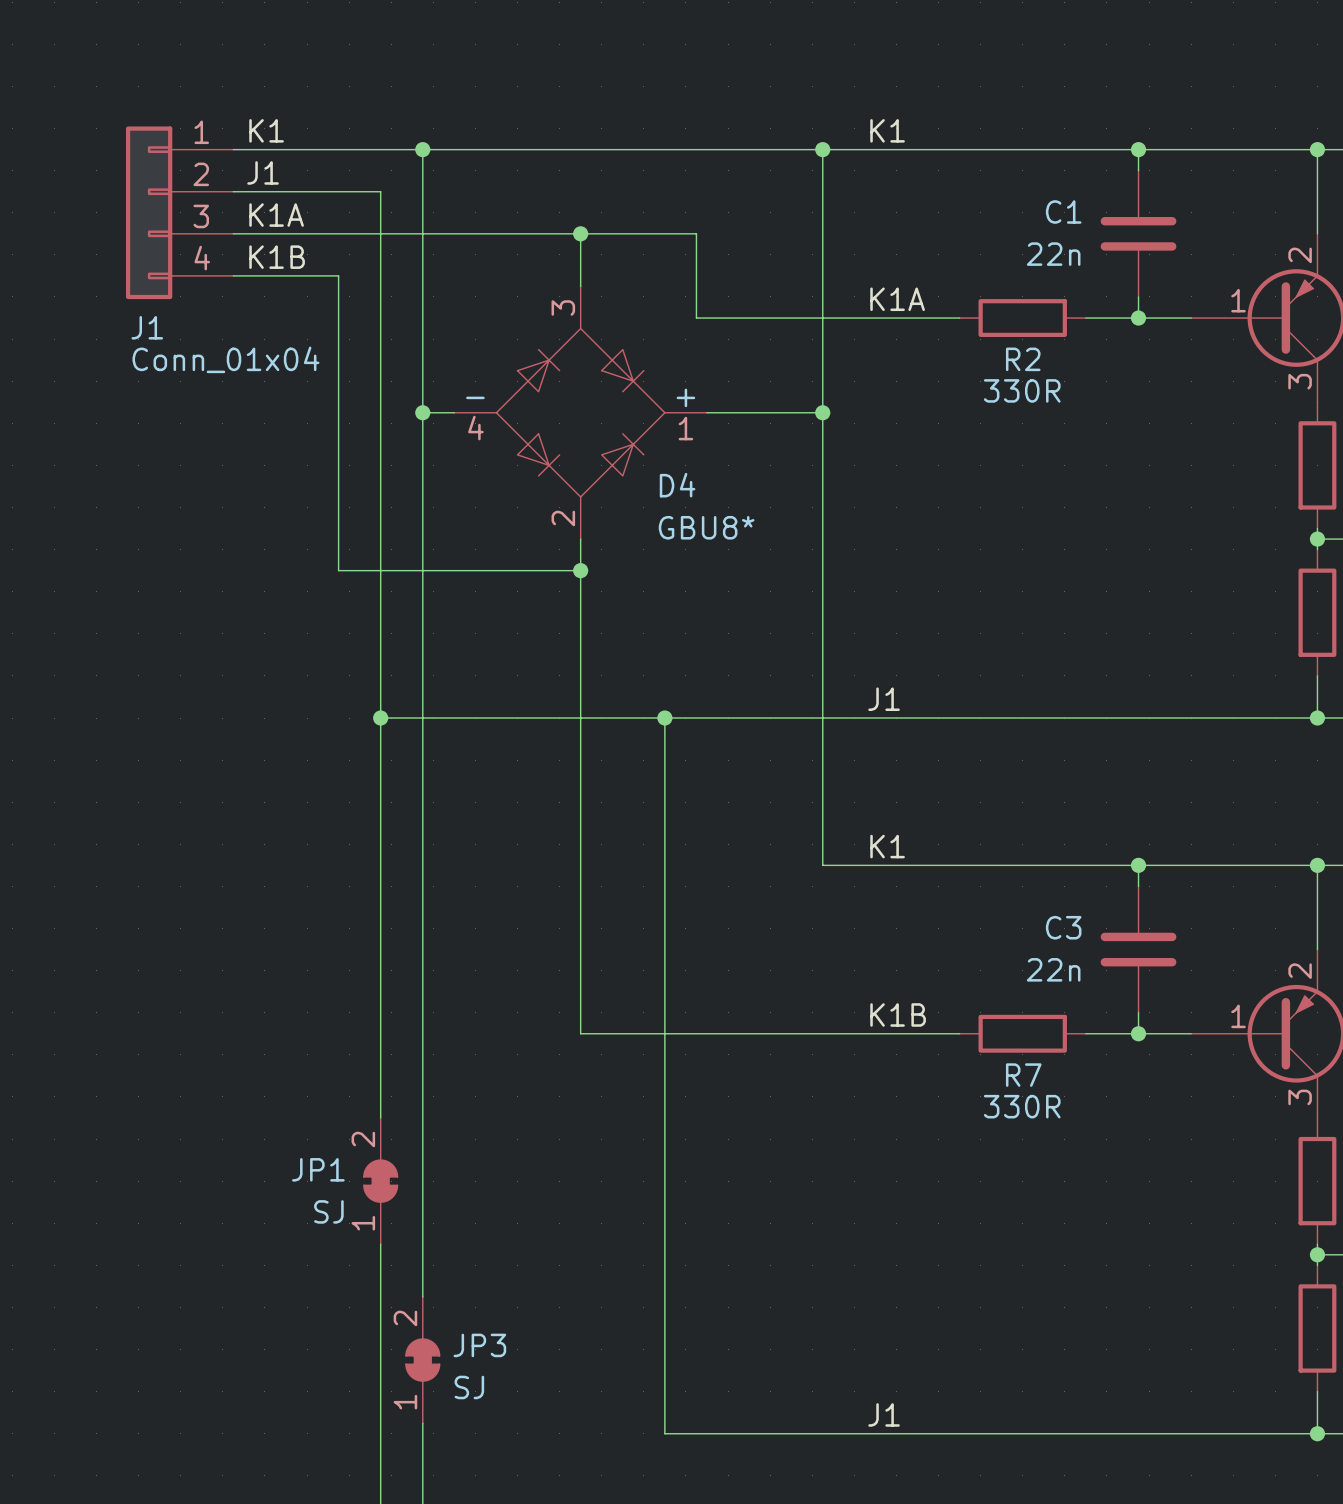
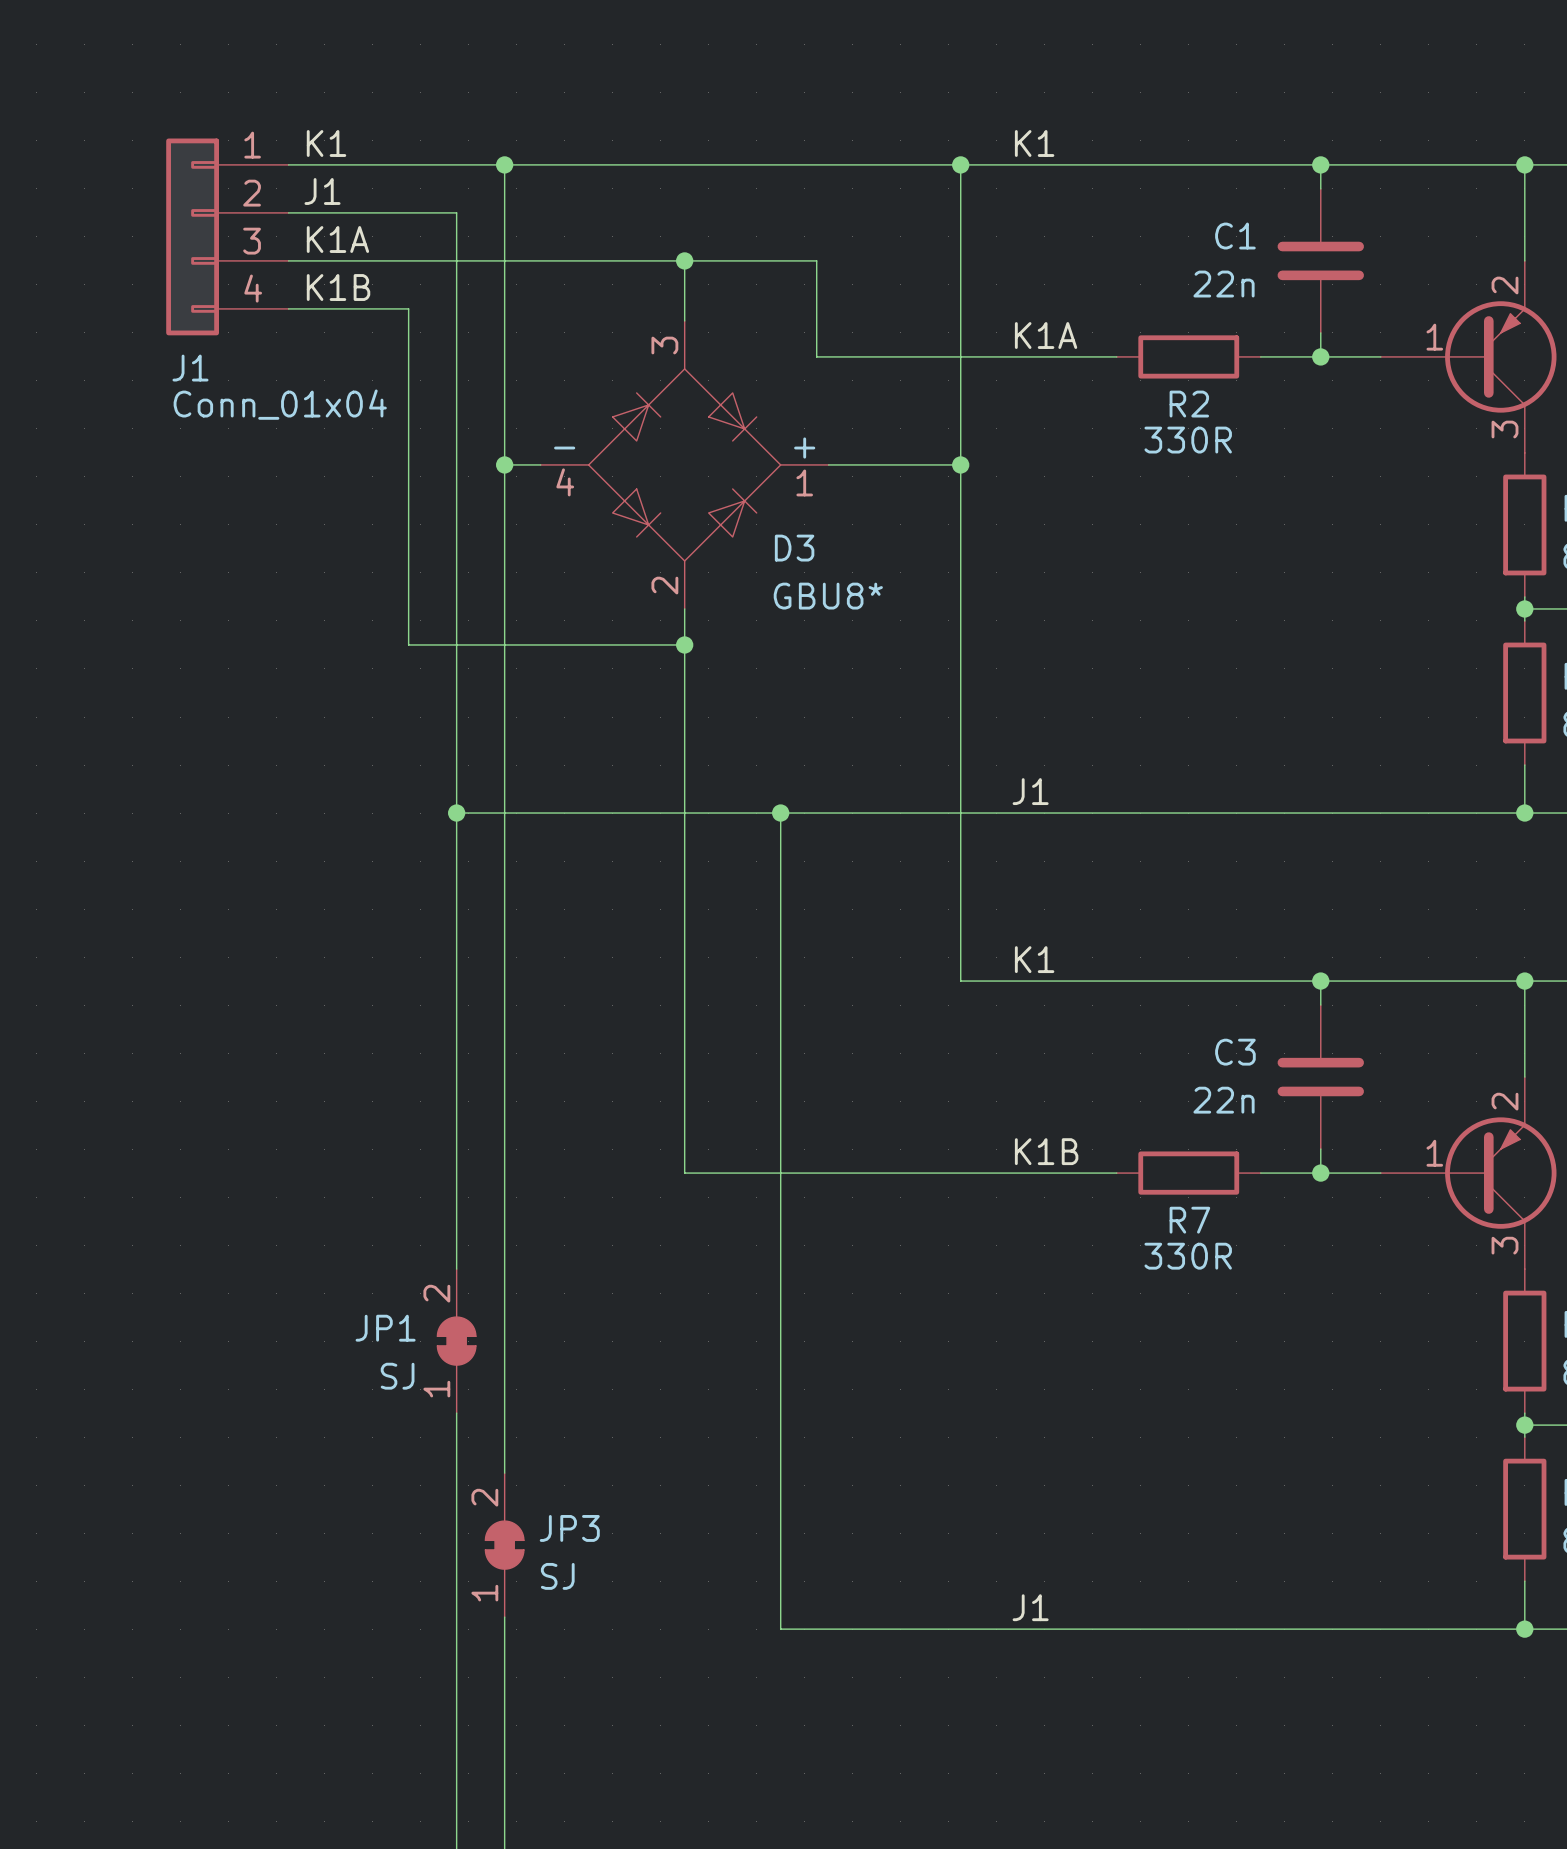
D4 name: D4 (677, 485) -> D3 (794, 548)

